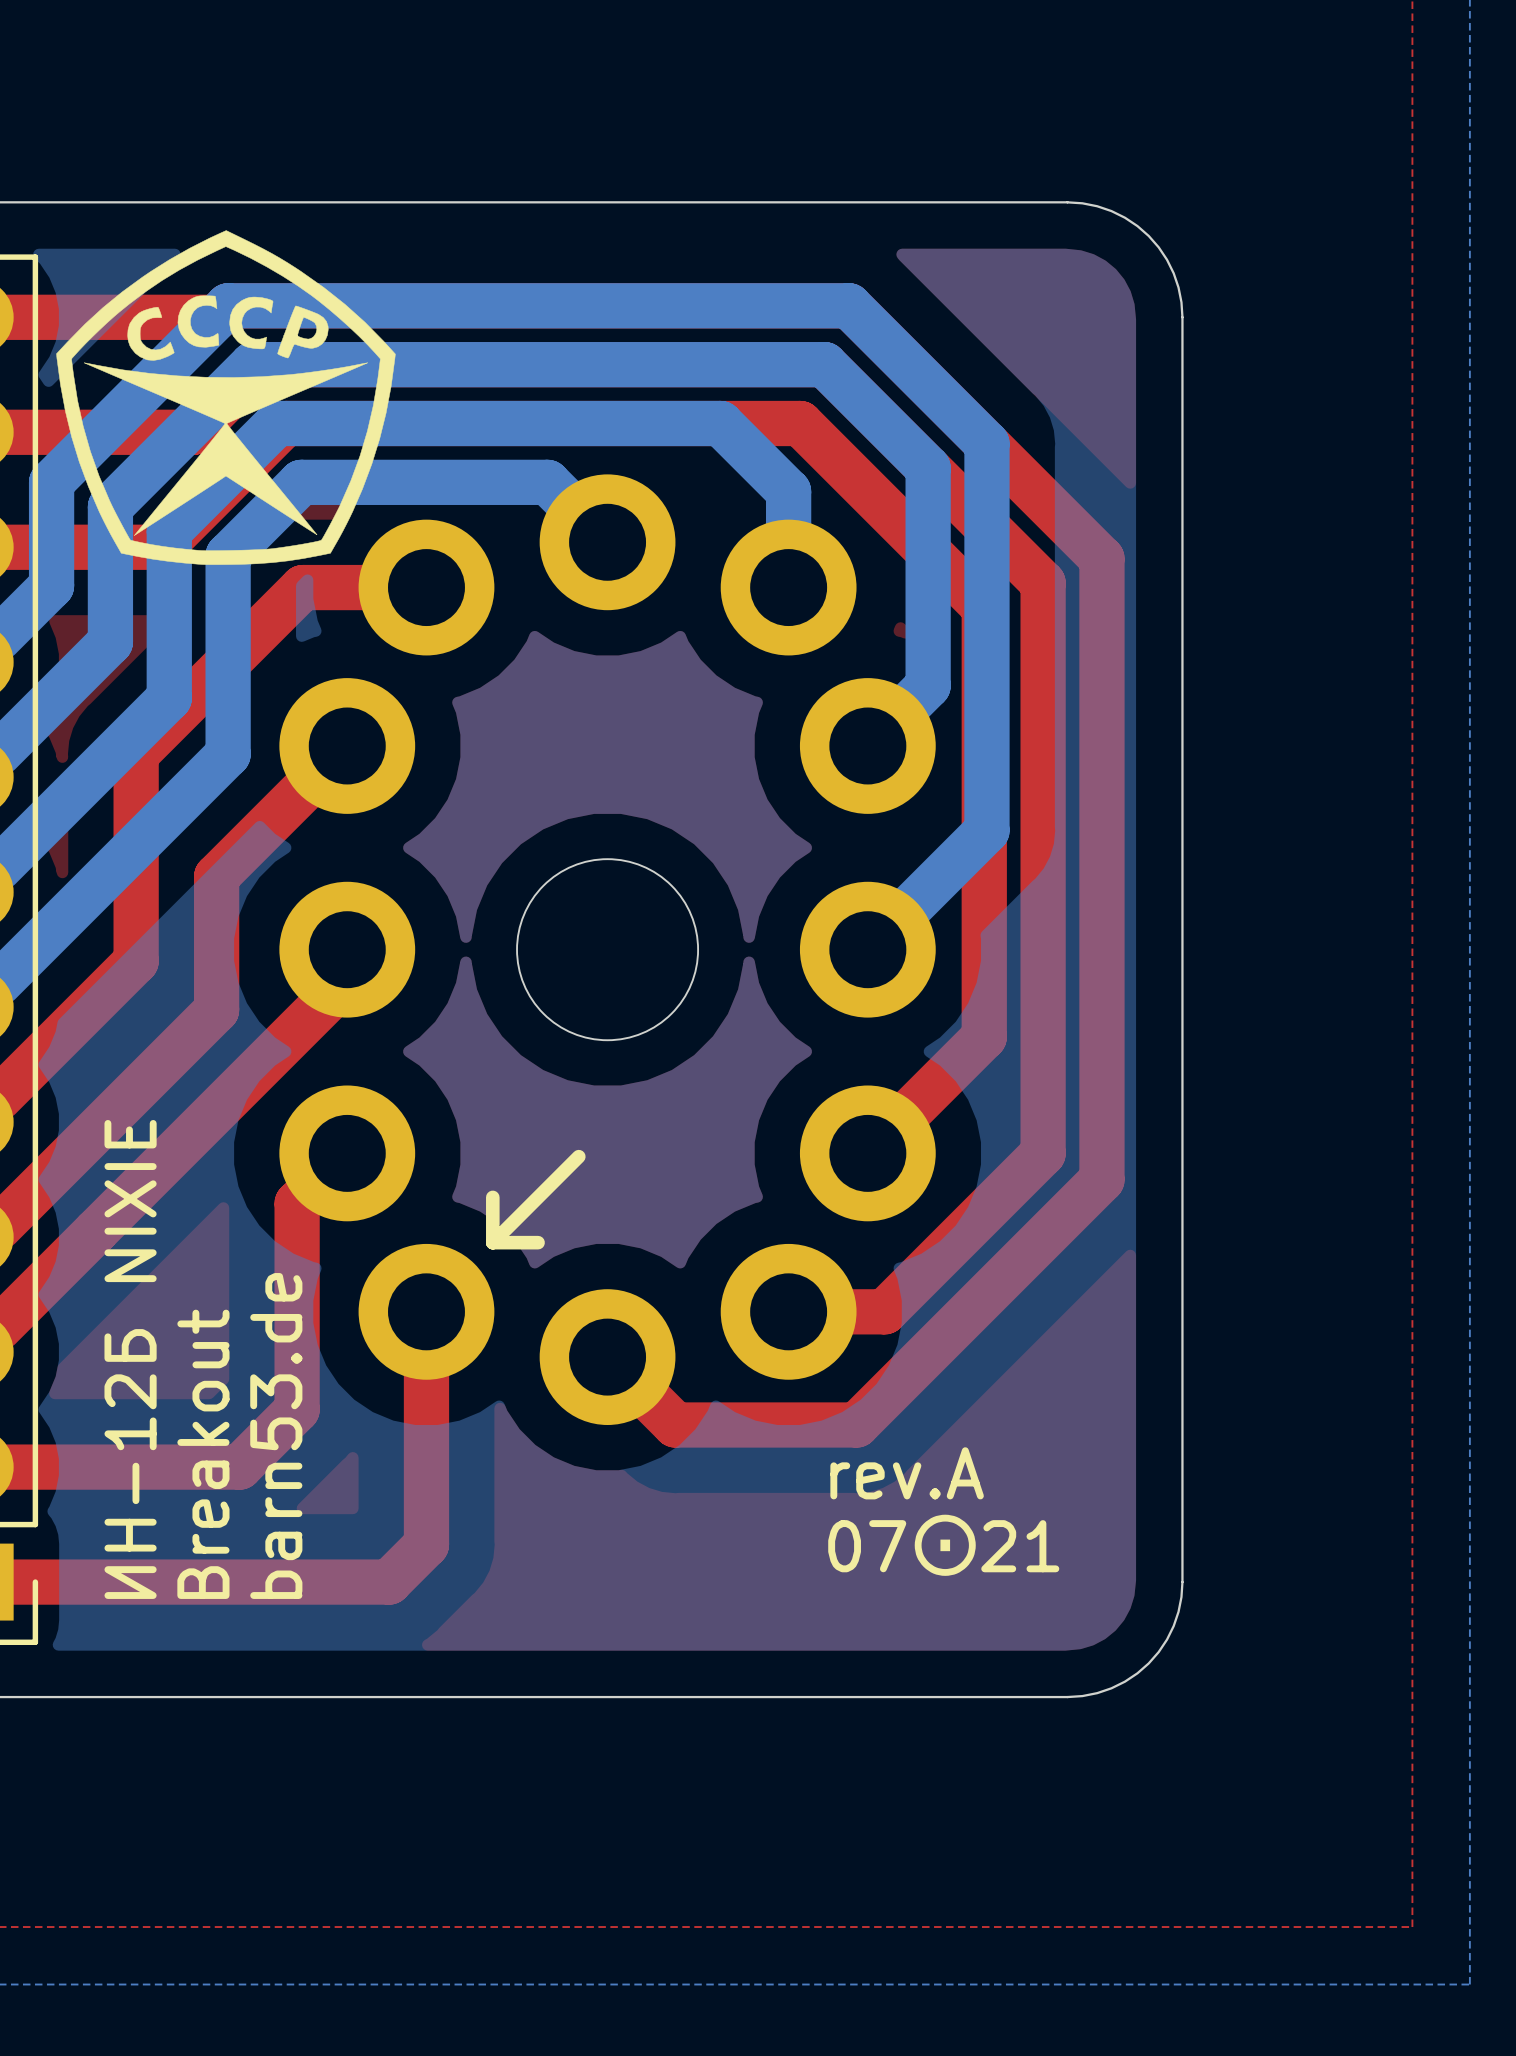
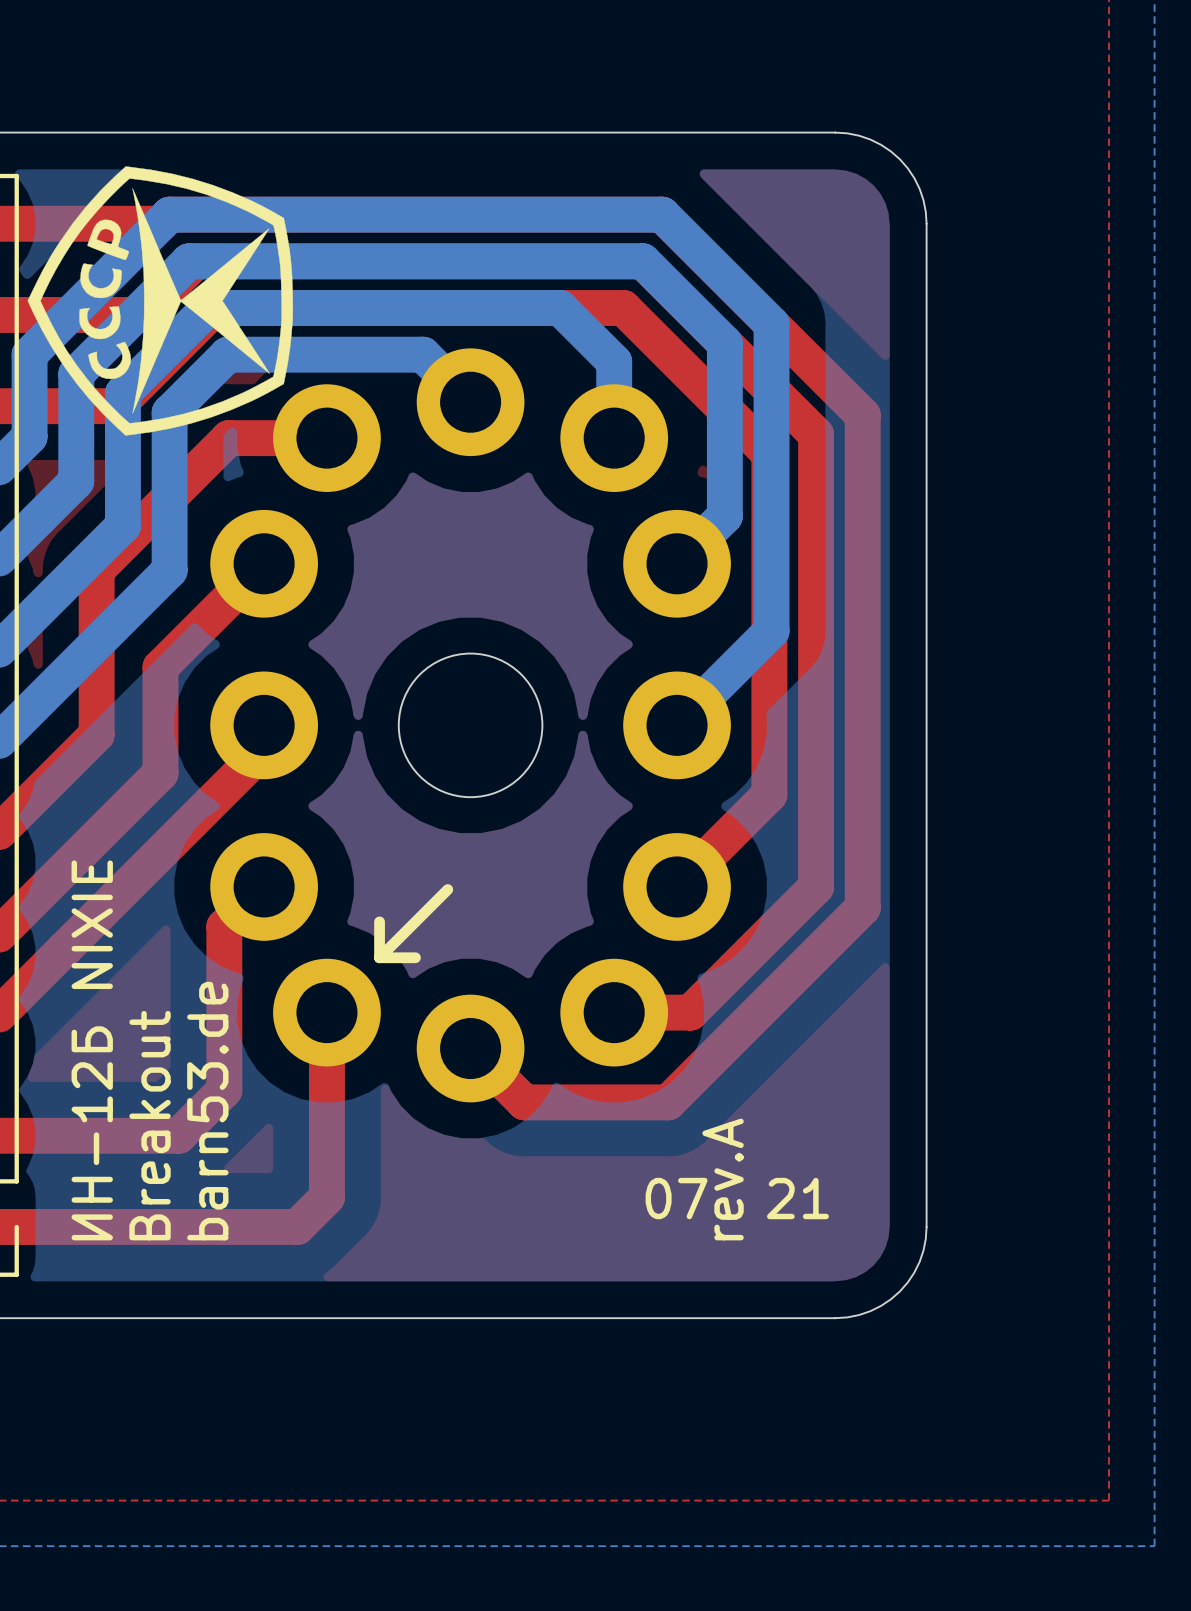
drawing shape: [56, 230, 396, 565] -> [27, 166, 293, 436]
text rotation: 0° (907, 1473) -> 90° counterclockwise (723, 1179)
text: ⊙ (945, 1545) -> none

